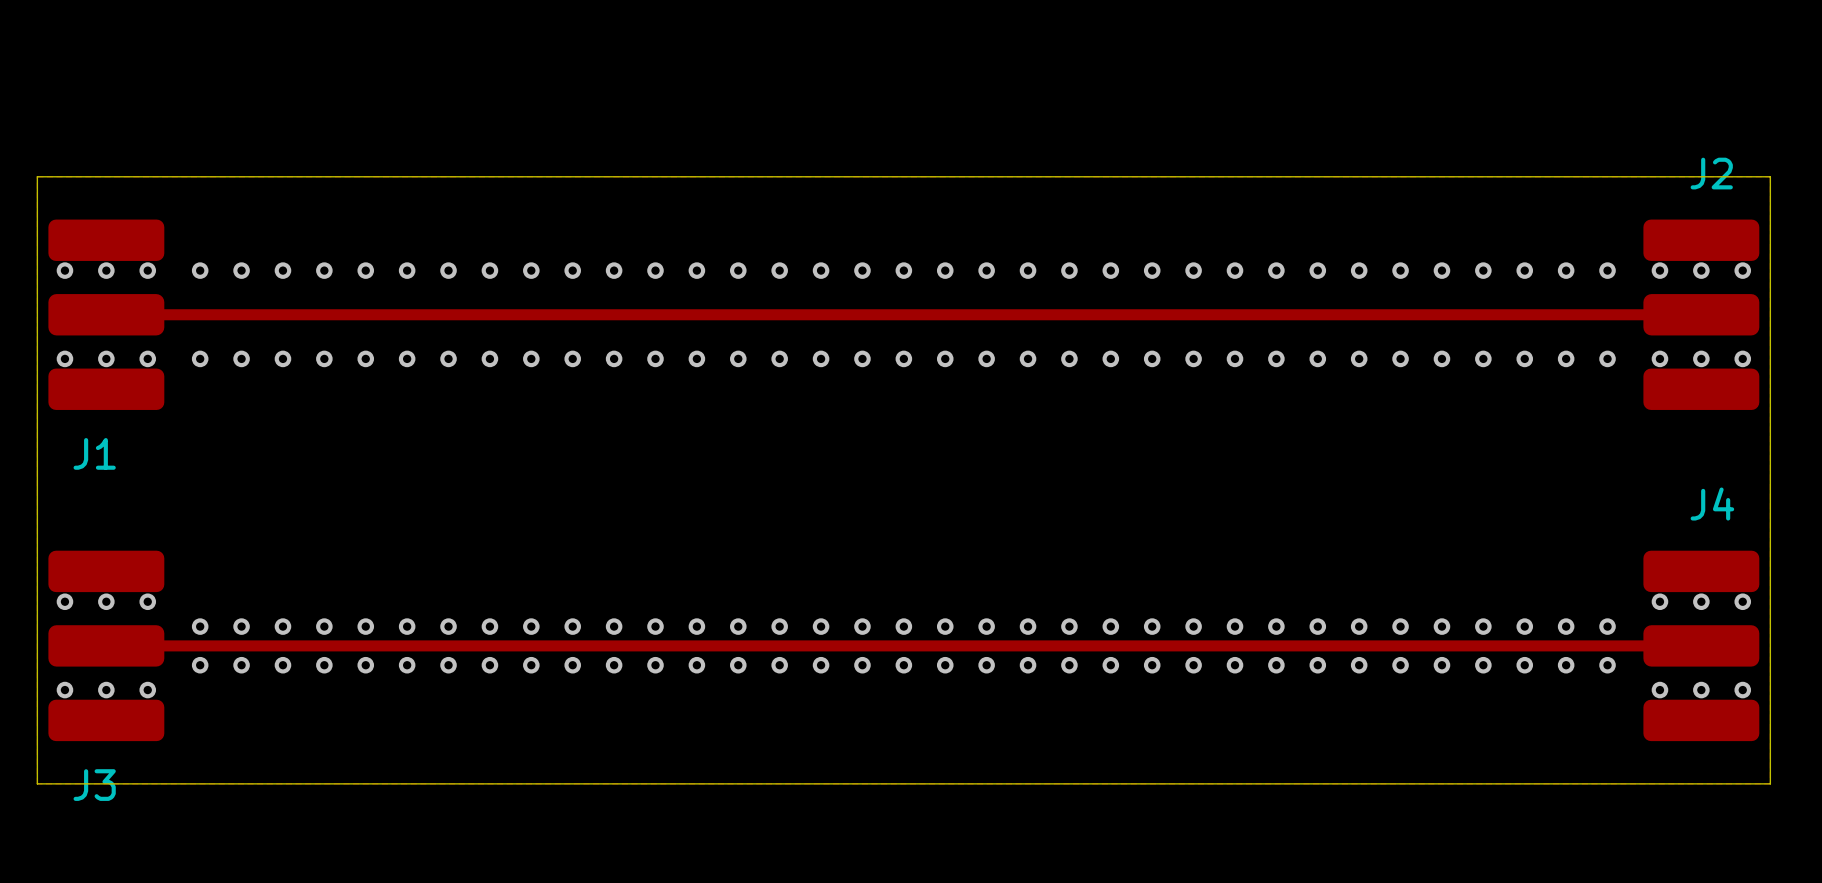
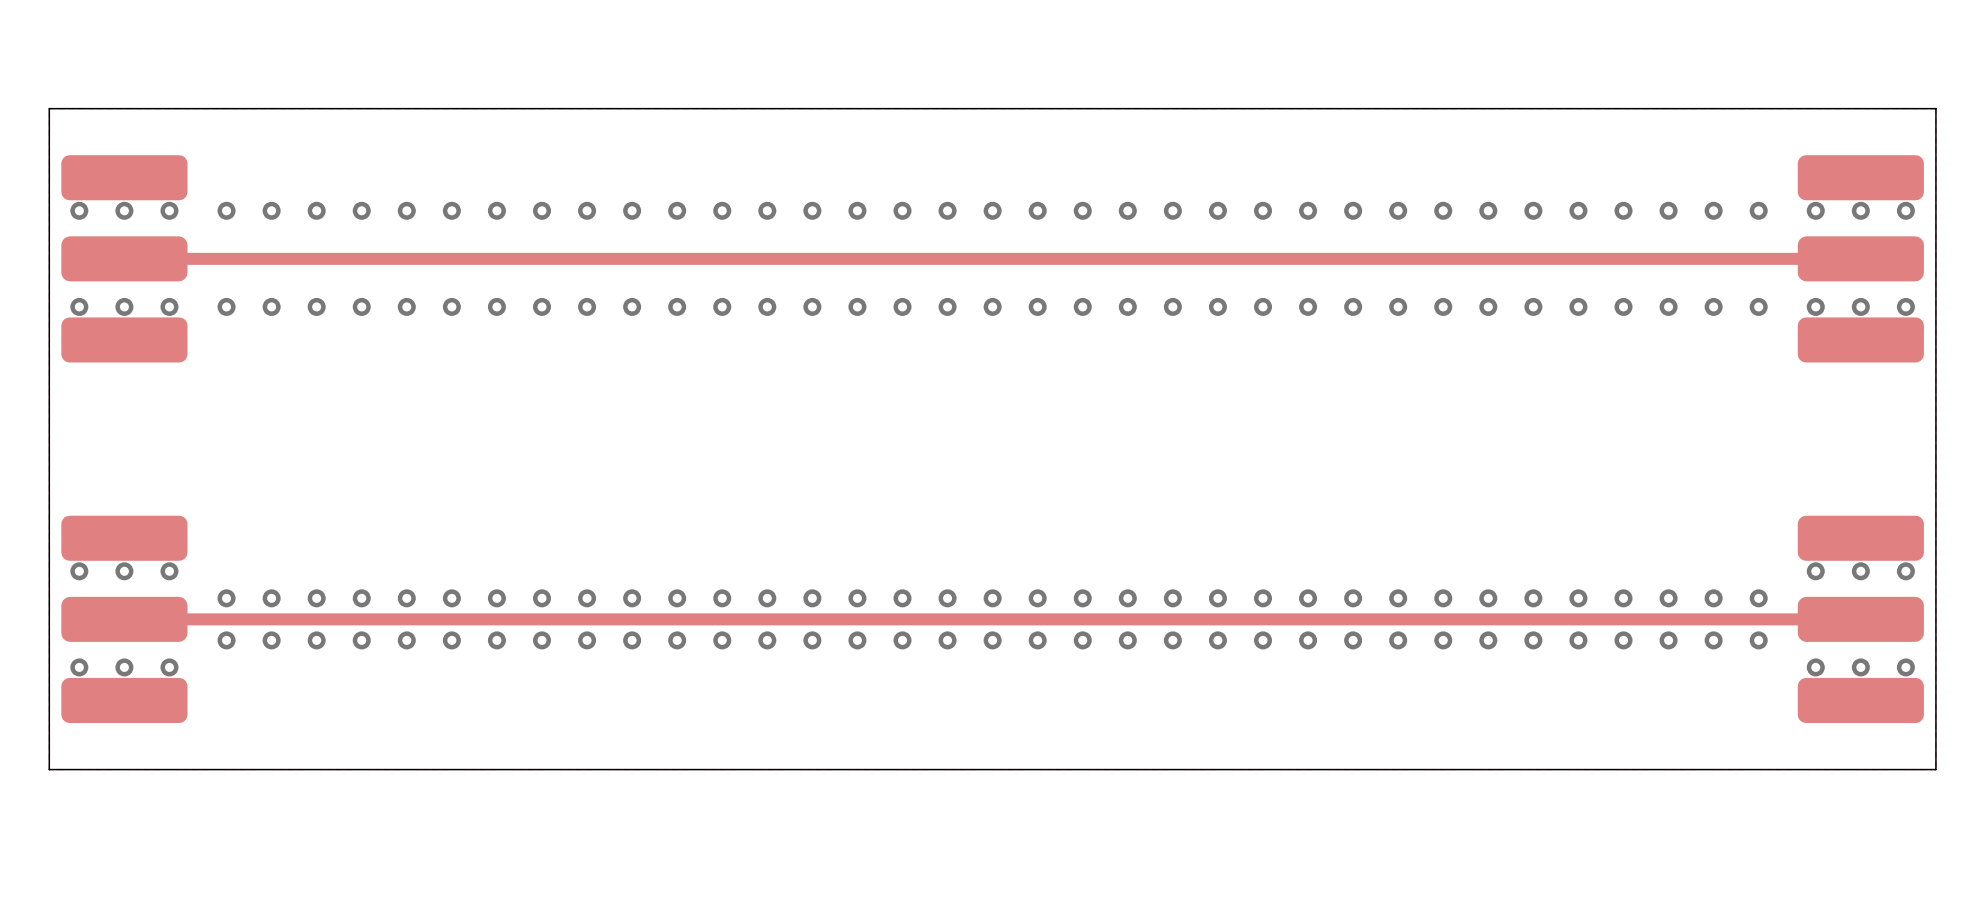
J2 name: J2 (1711, 173) -> none
J1 name: J1 (94, 453) -> none
J4 name: J4 (1712, 504) -> none
J3 name: J3 (94, 785) -> none

